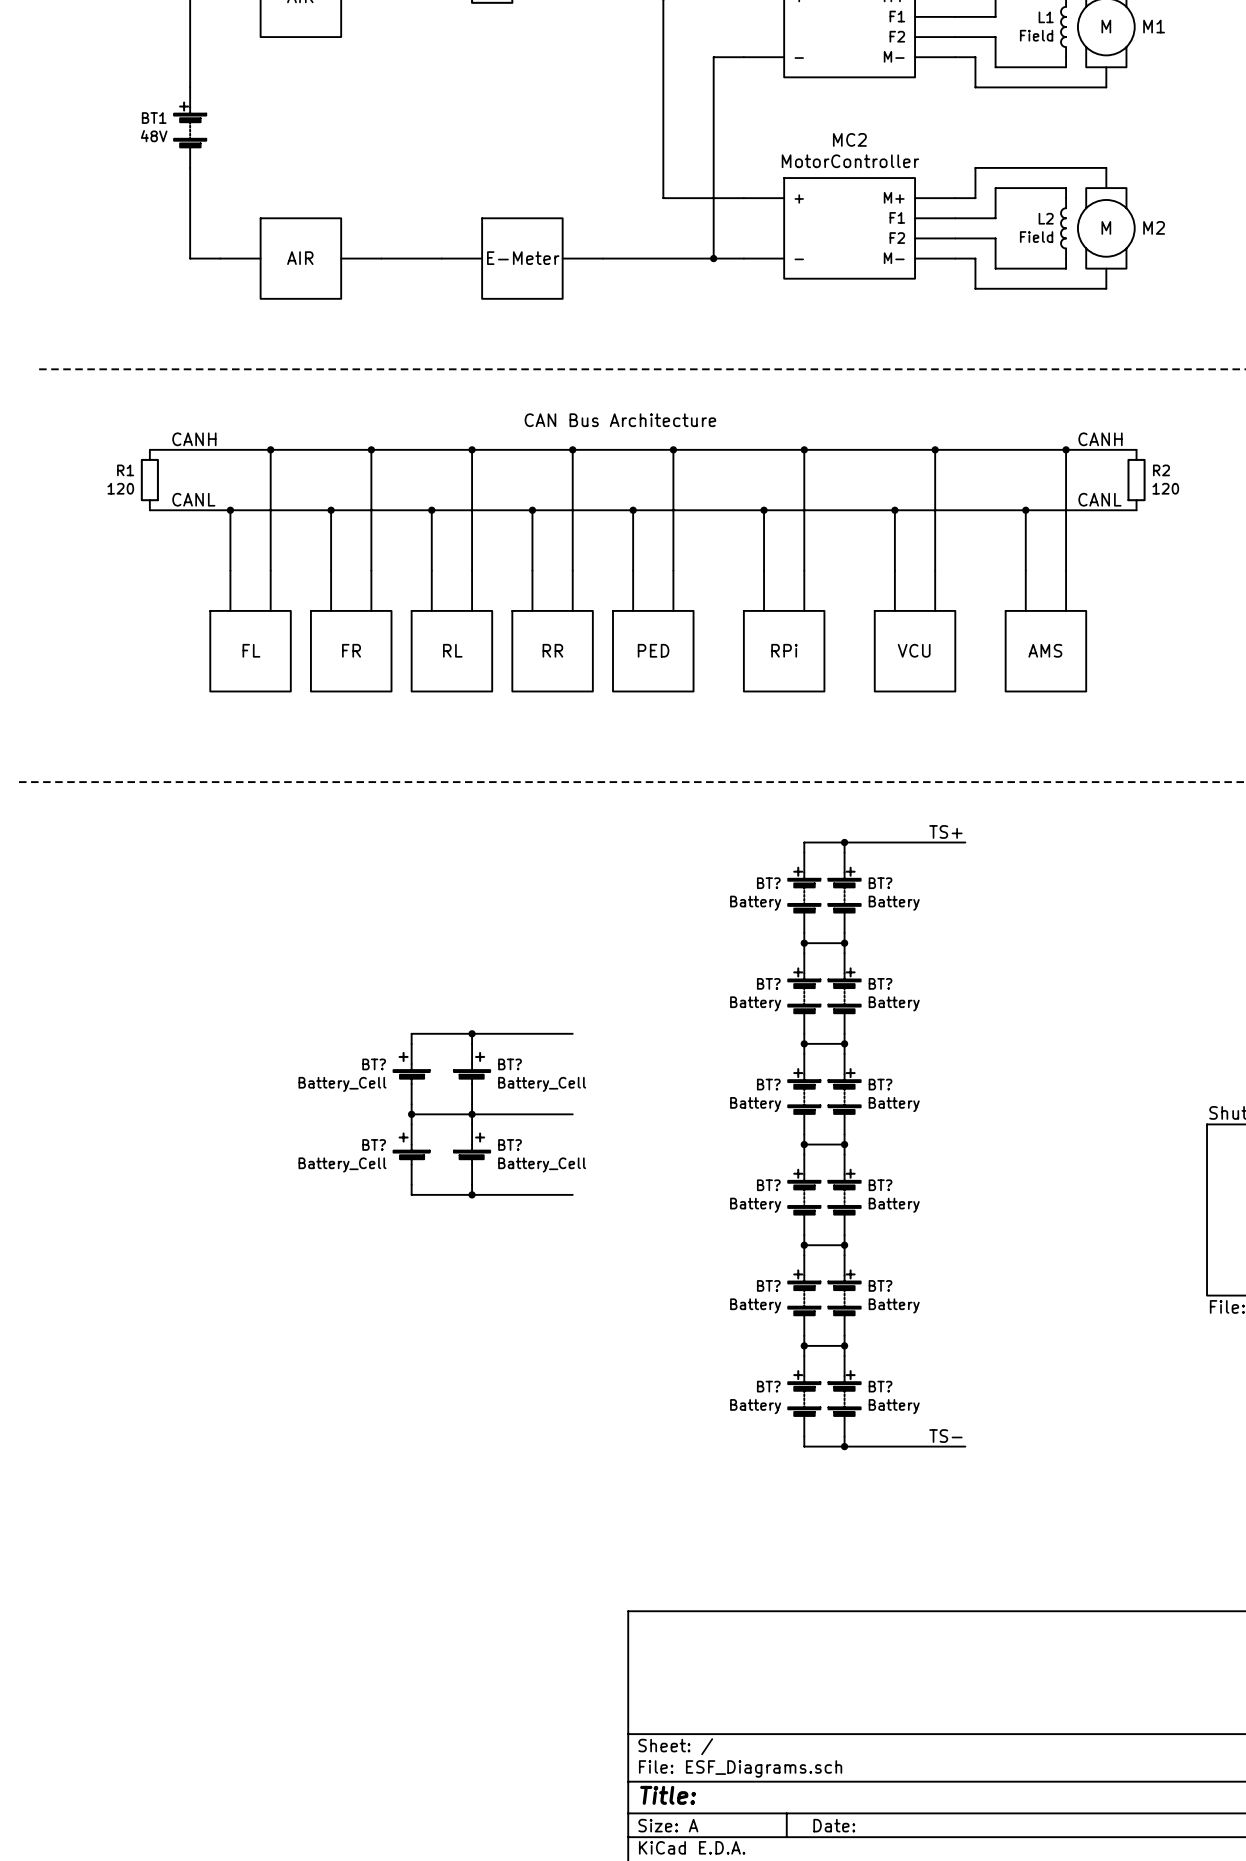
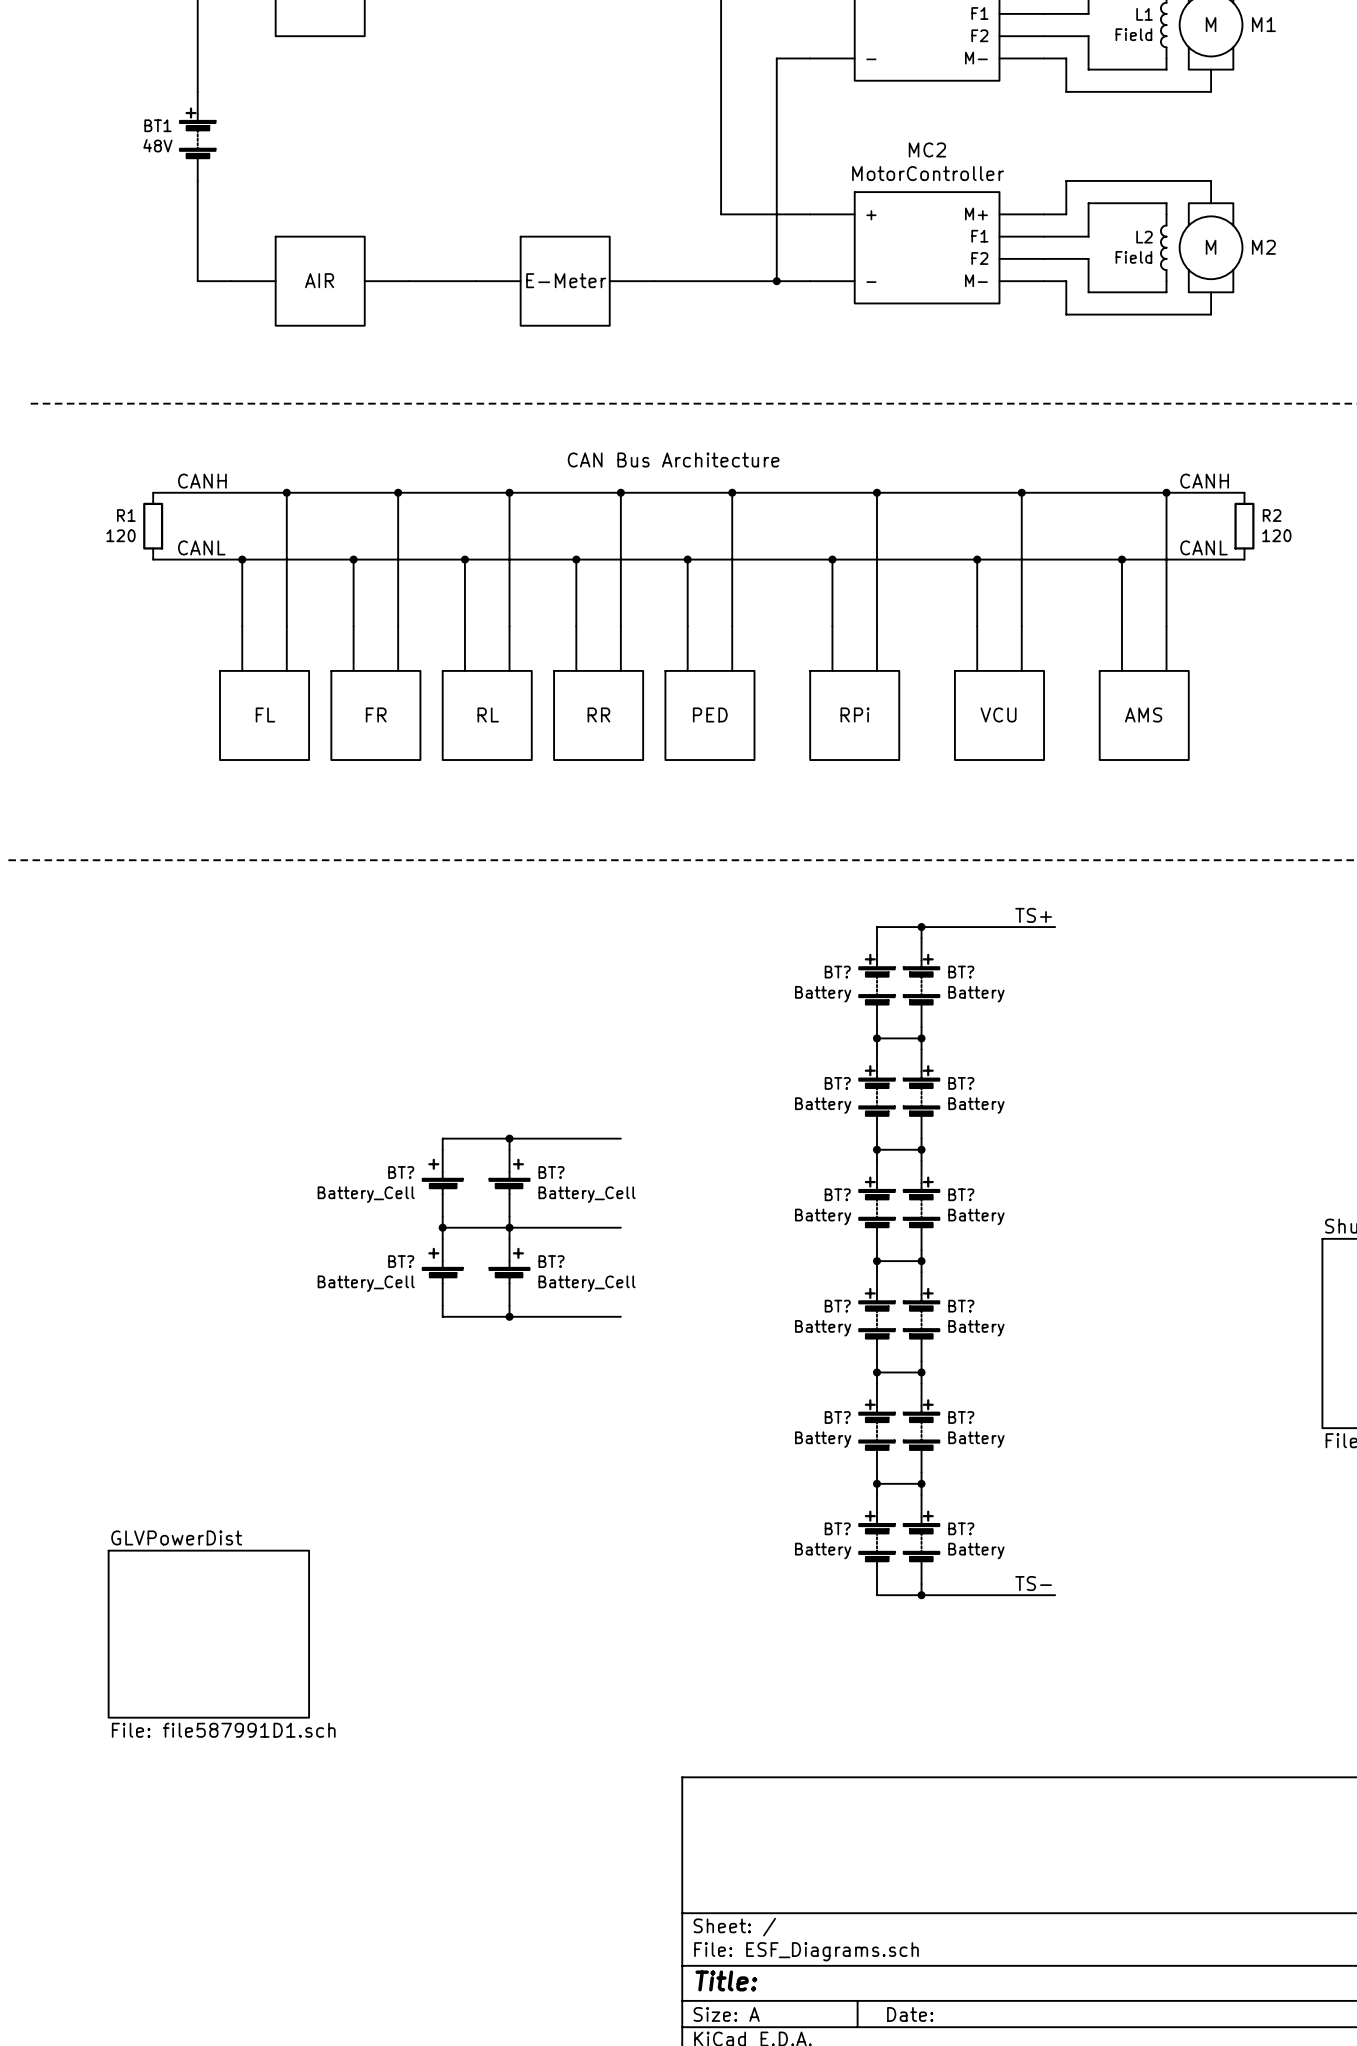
sheet GLVPowerDist: none -> File: file587991D1.sch (208, 1634)

